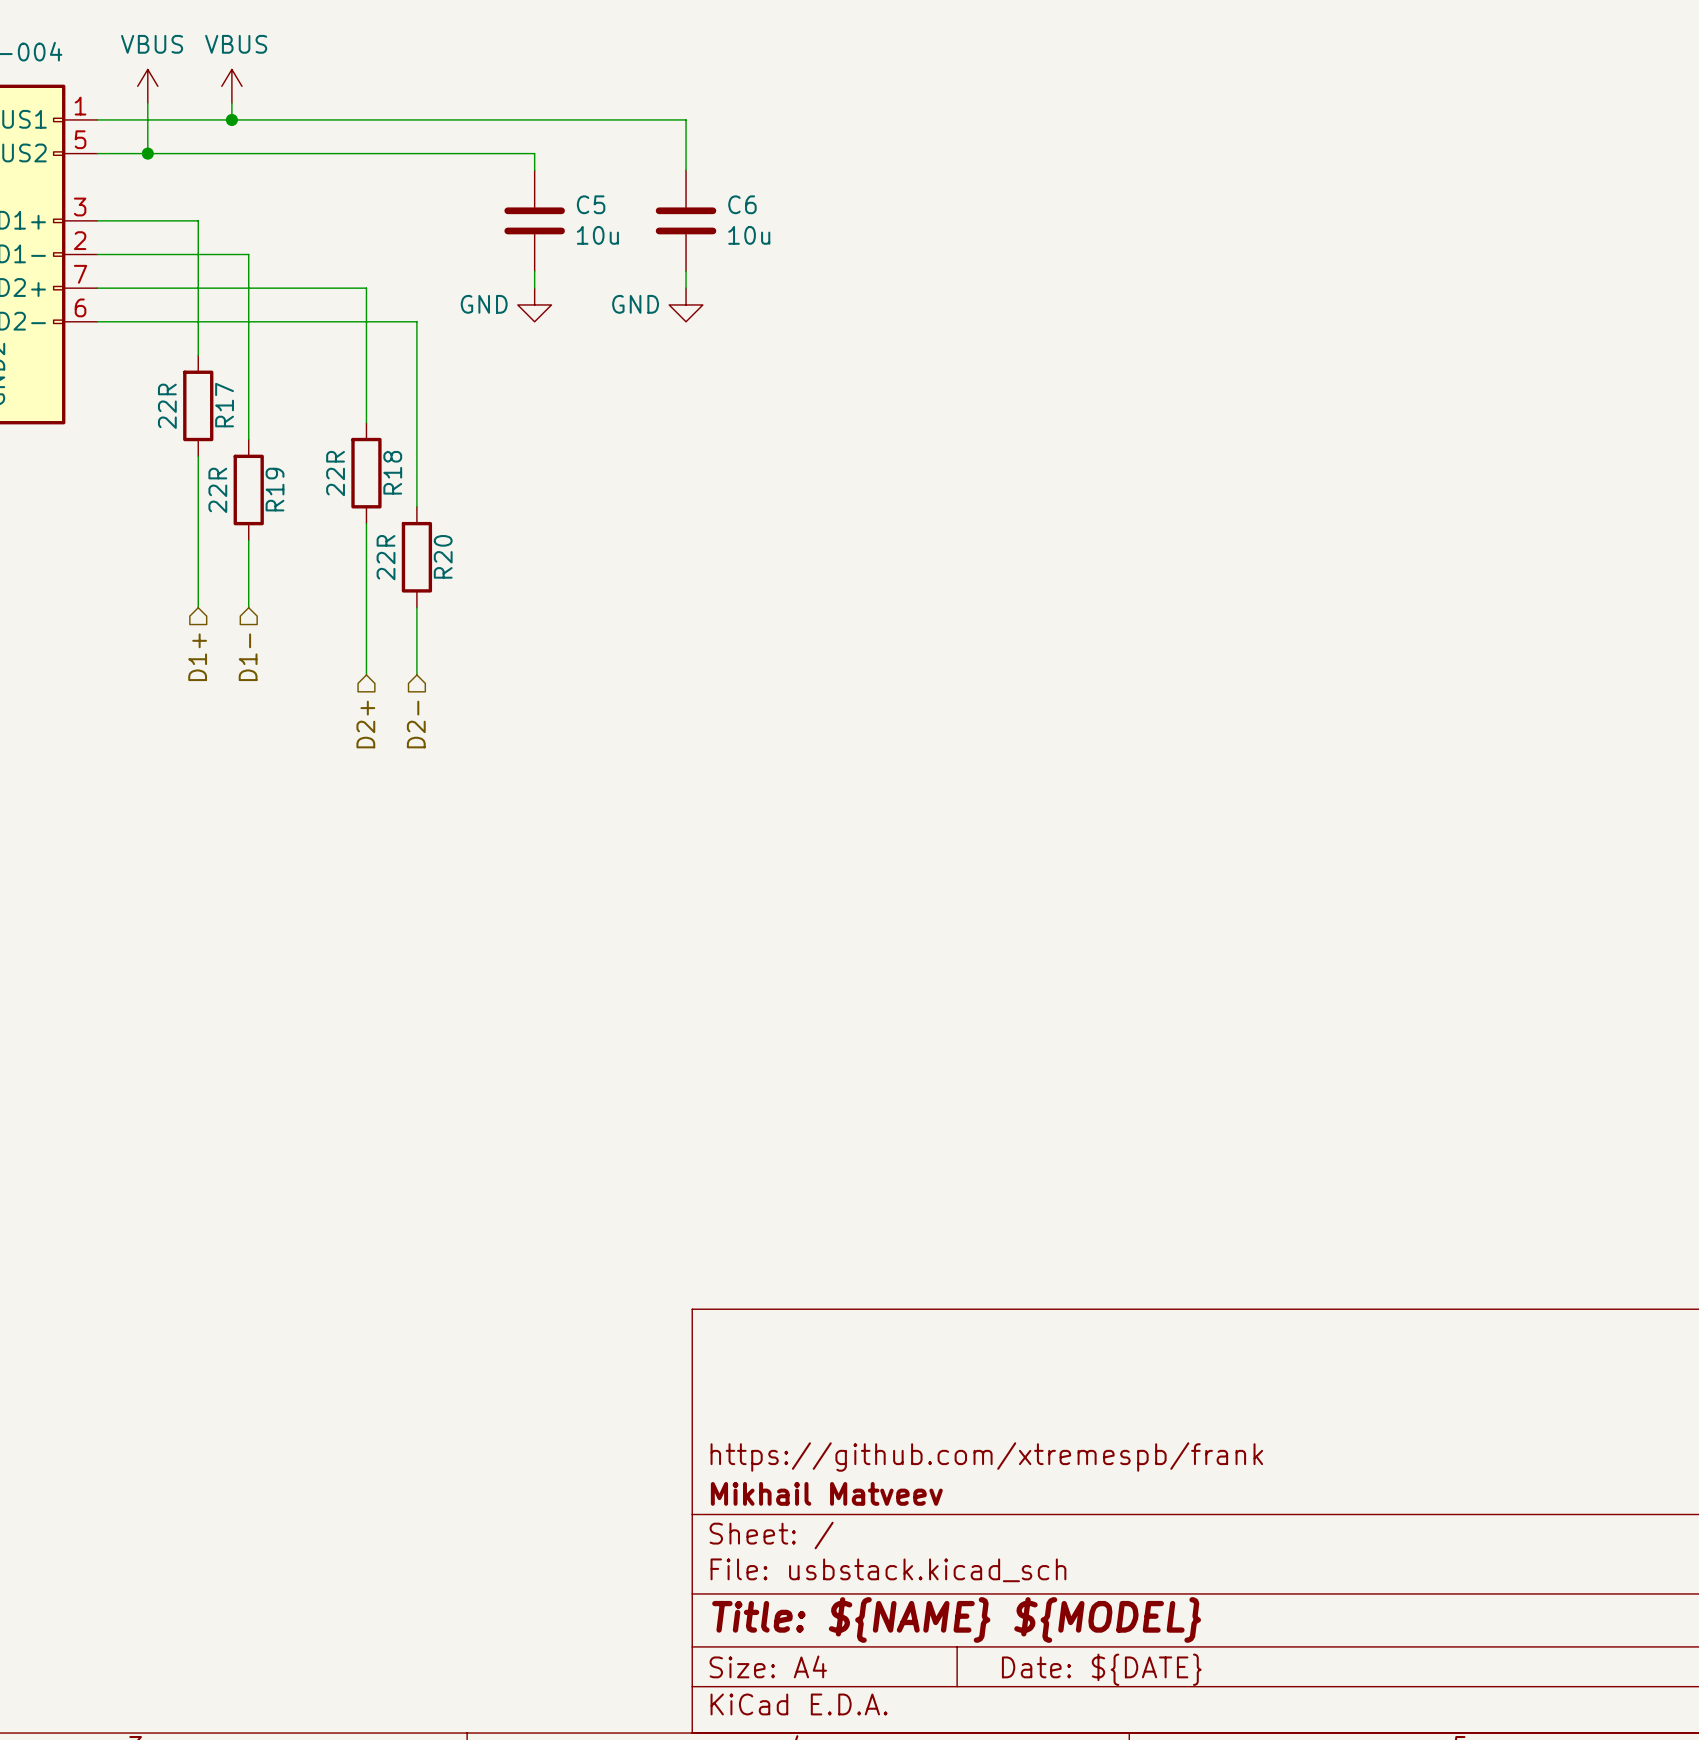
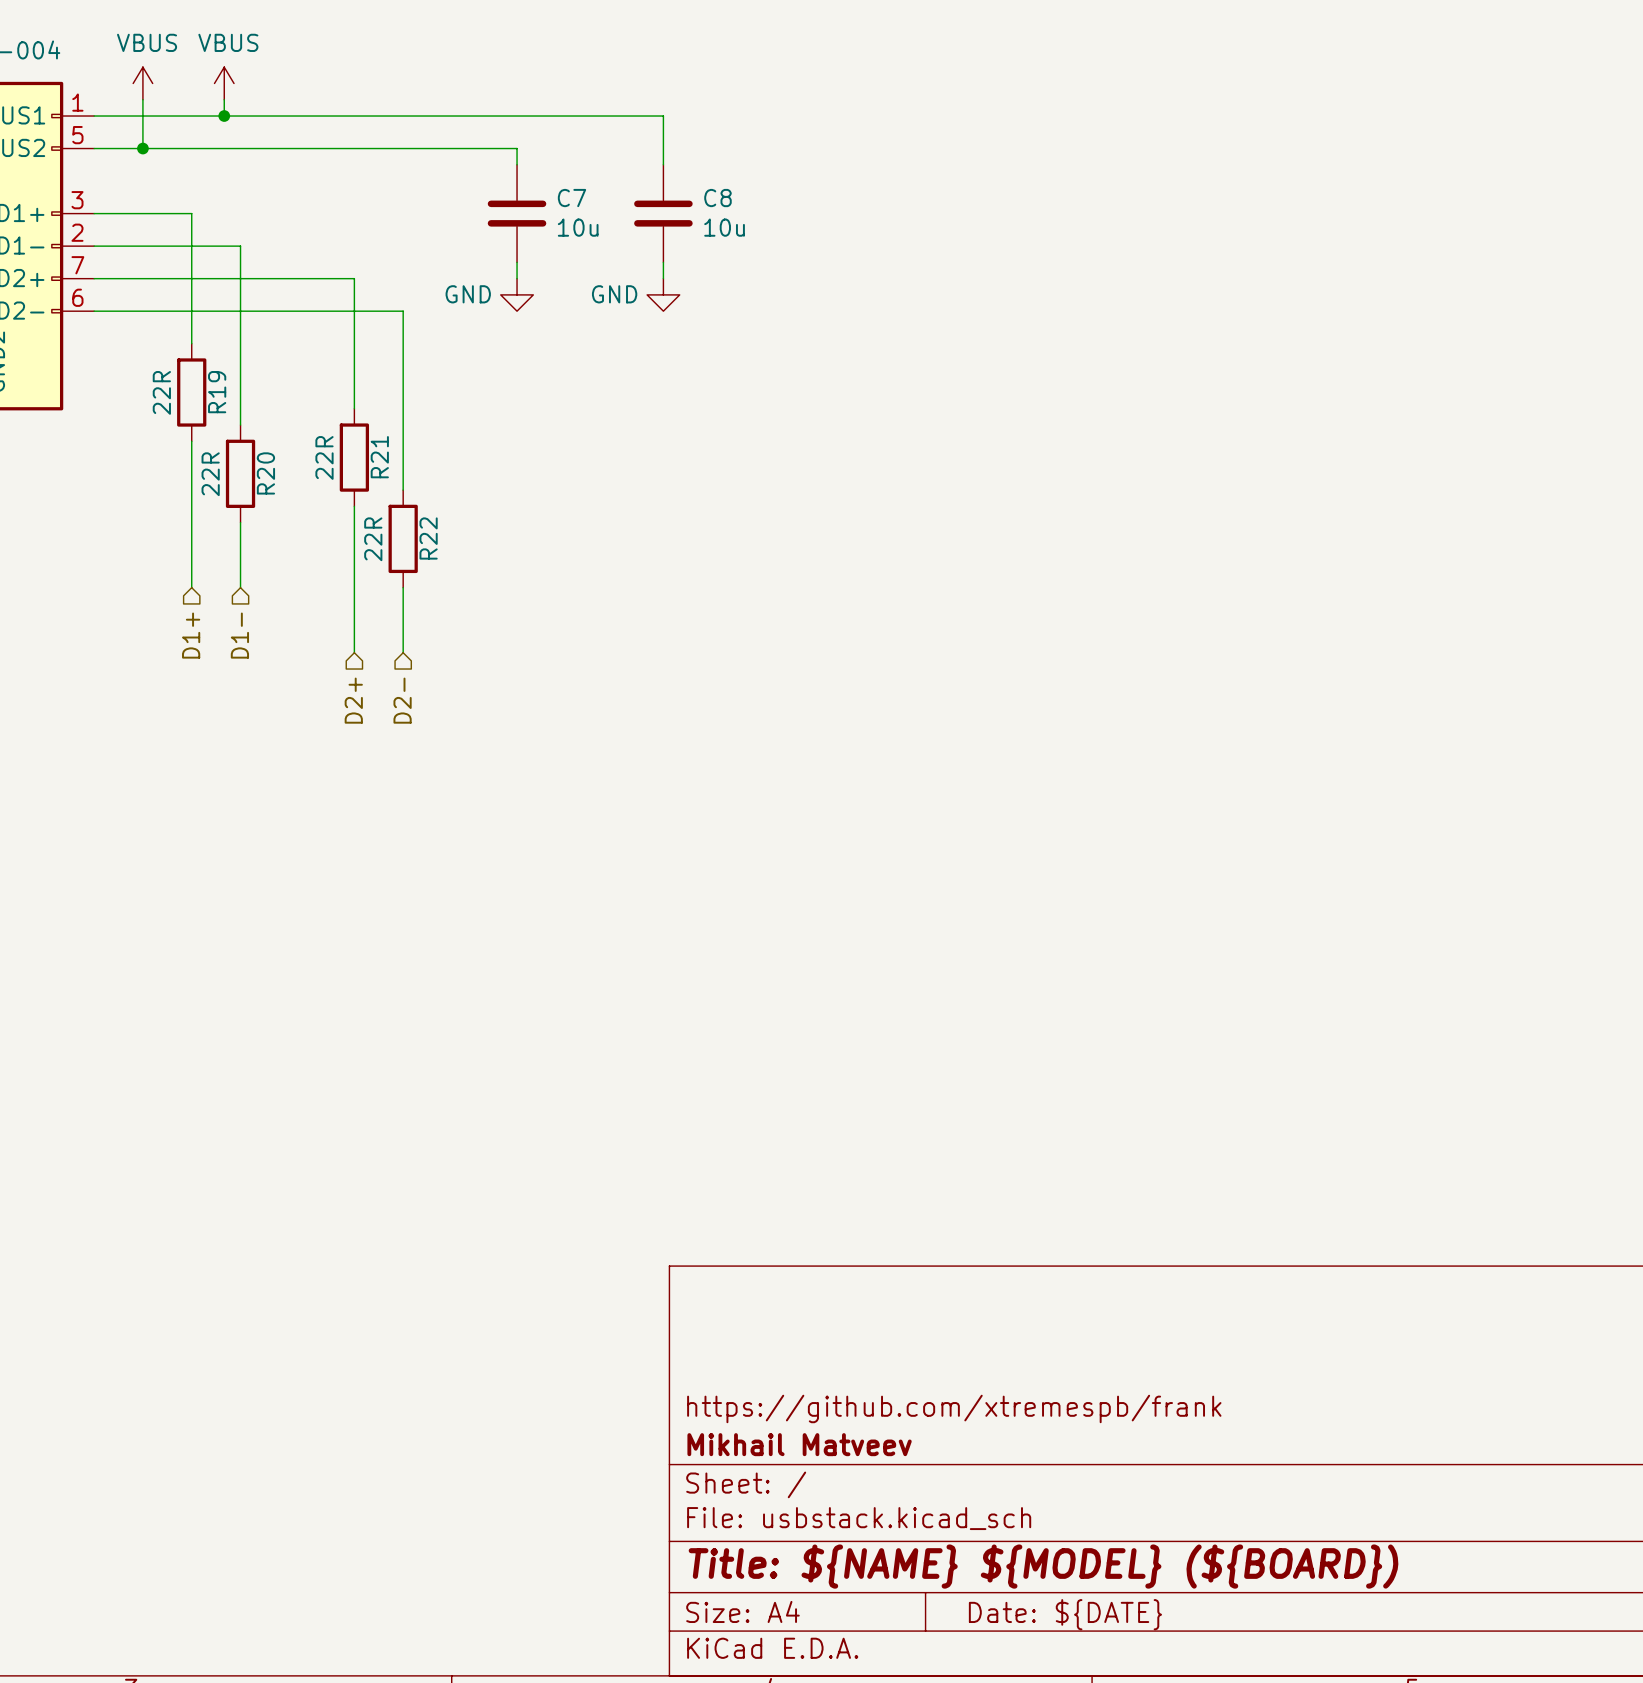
C5 name: C5 (591, 204) -> C7 (571, 198)
C6 name: C6 (742, 204) -> C8 (717, 198)
R17 name: R17 (224, 405) -> R19 (217, 392)
R18 name: R18 (392, 472) -> R21 (379, 457)
R19 name: R19 (275, 489) -> R20 (265, 473)
R20 name: R20 (443, 556) -> R22 (428, 538)
title block: Title: ${NAME} ${MODEL} (956, 1619) -> Title: ${NAME} ${MODEL} (${BOARD}) (1043, 1566)

